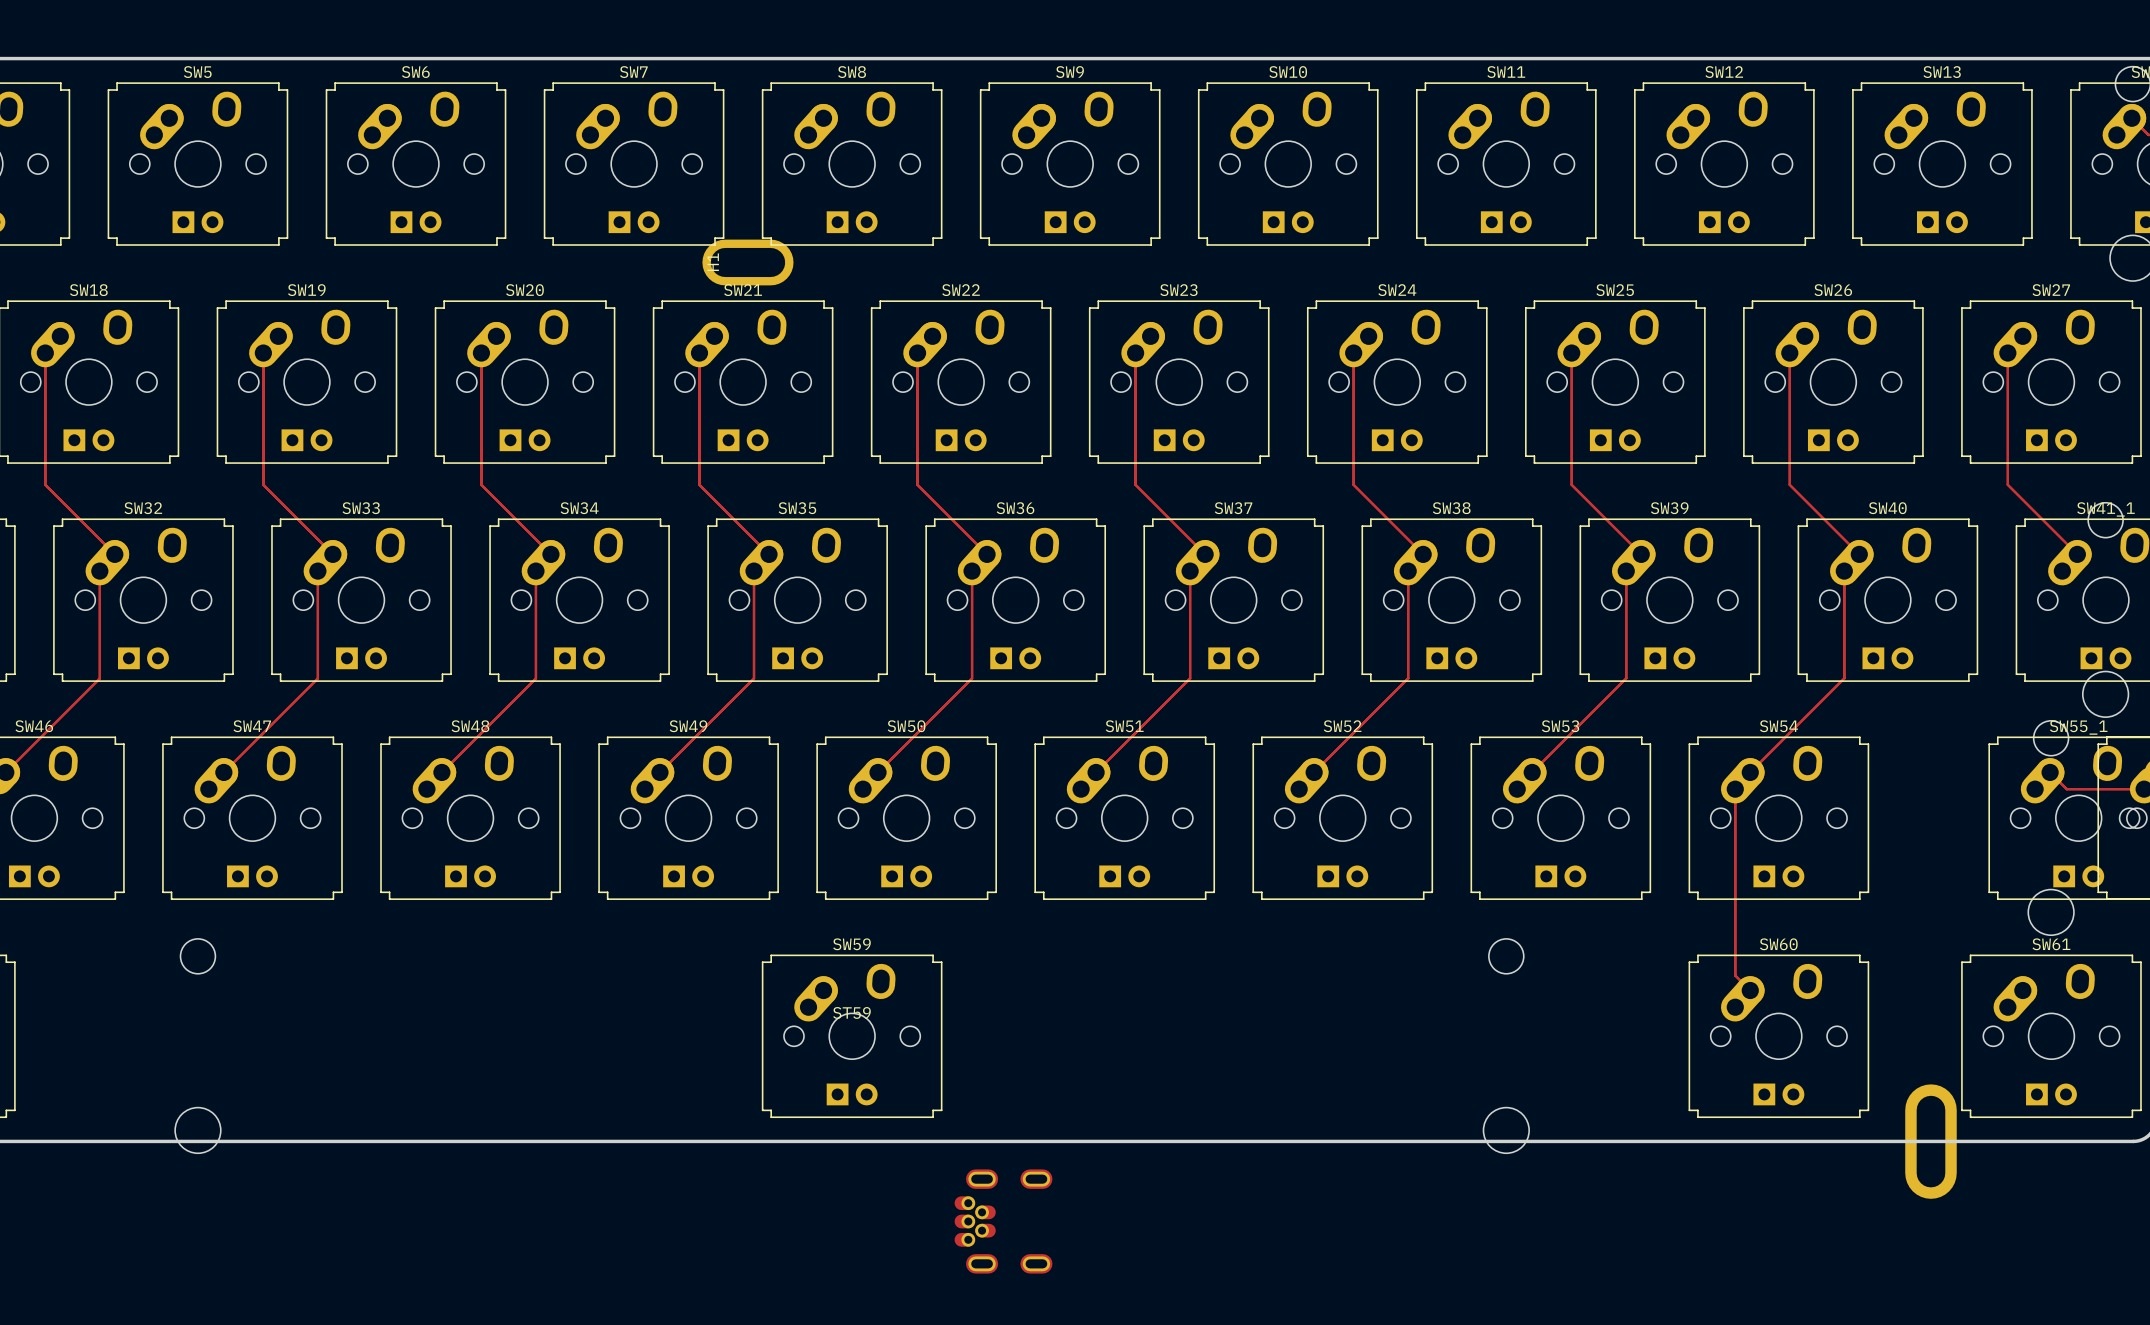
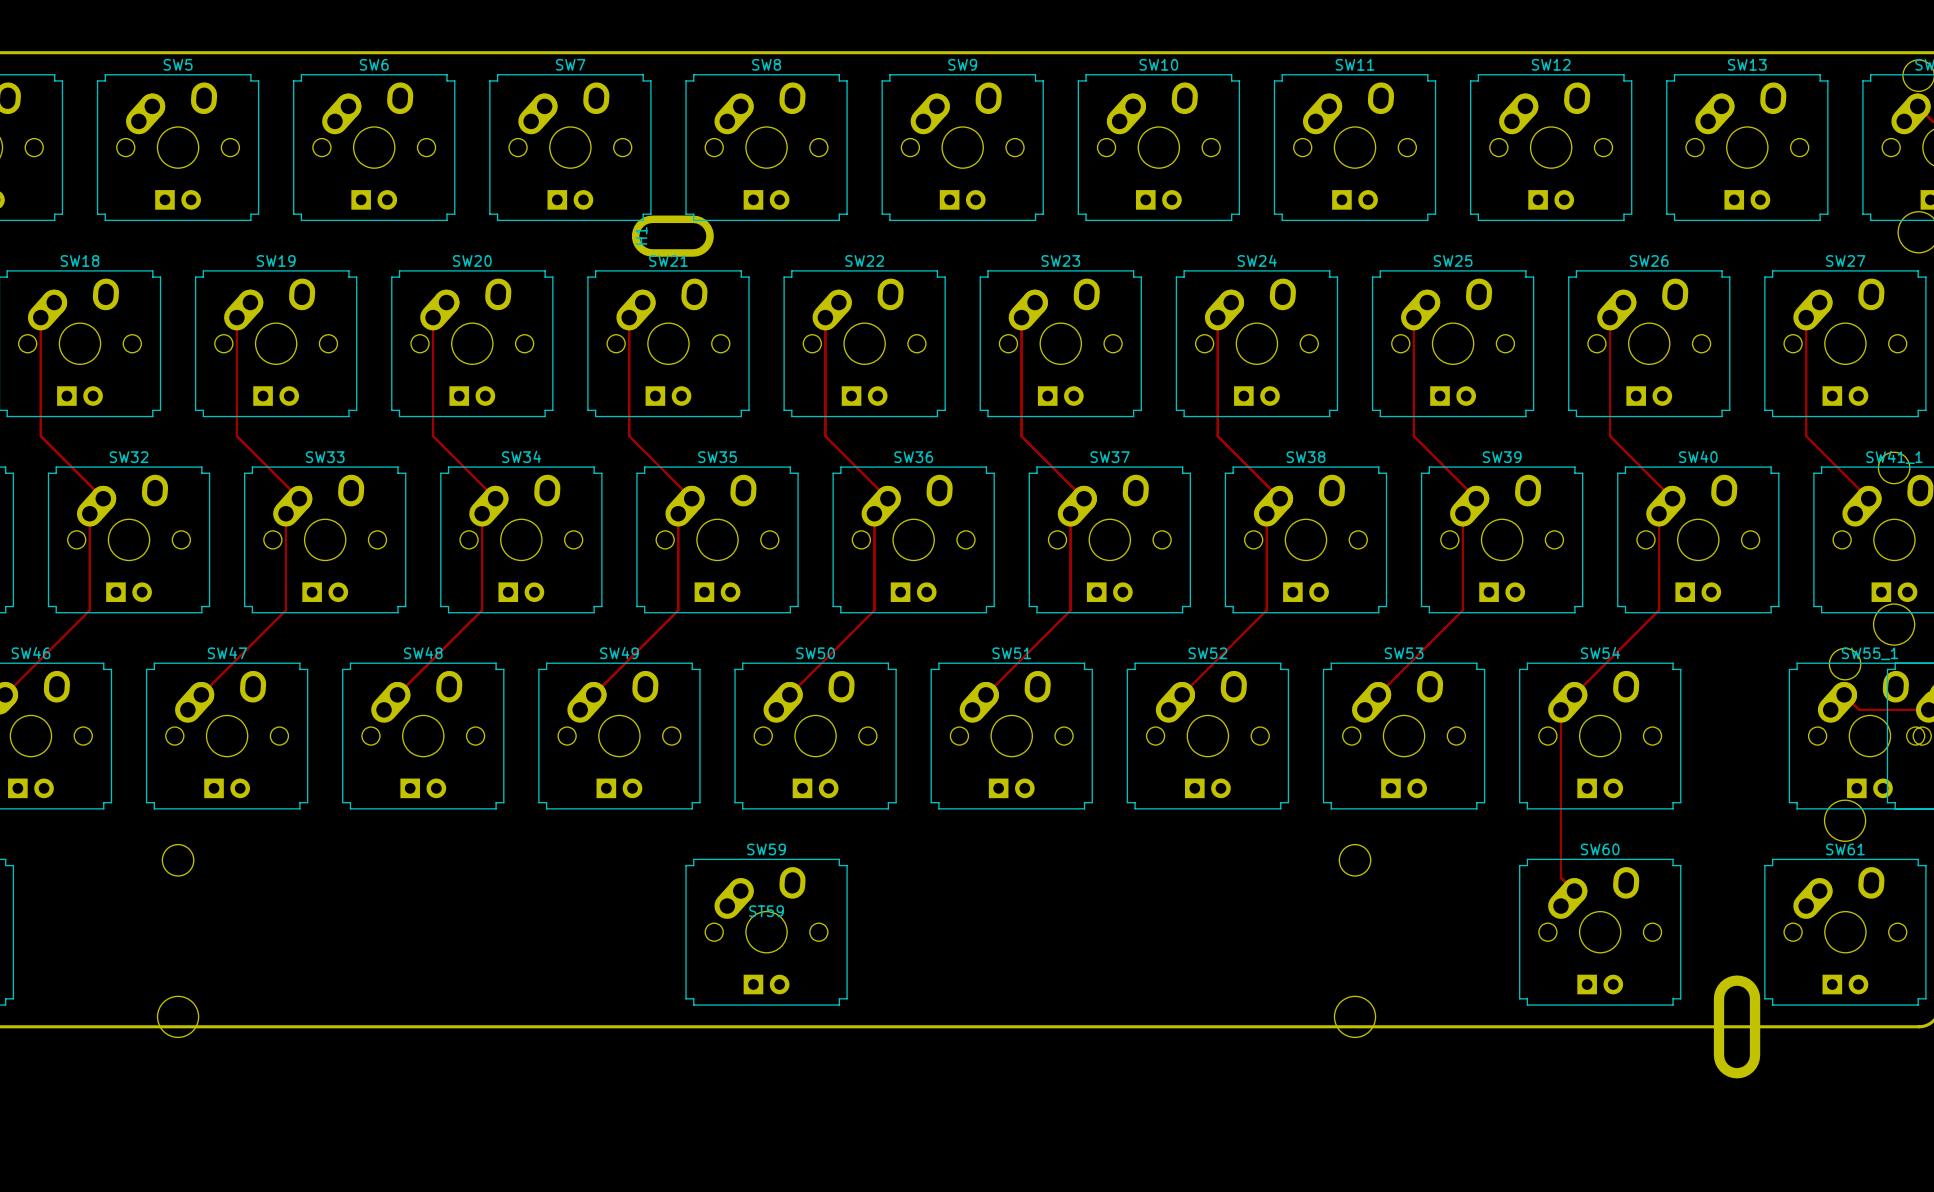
part: (1003, 1221) -> none

